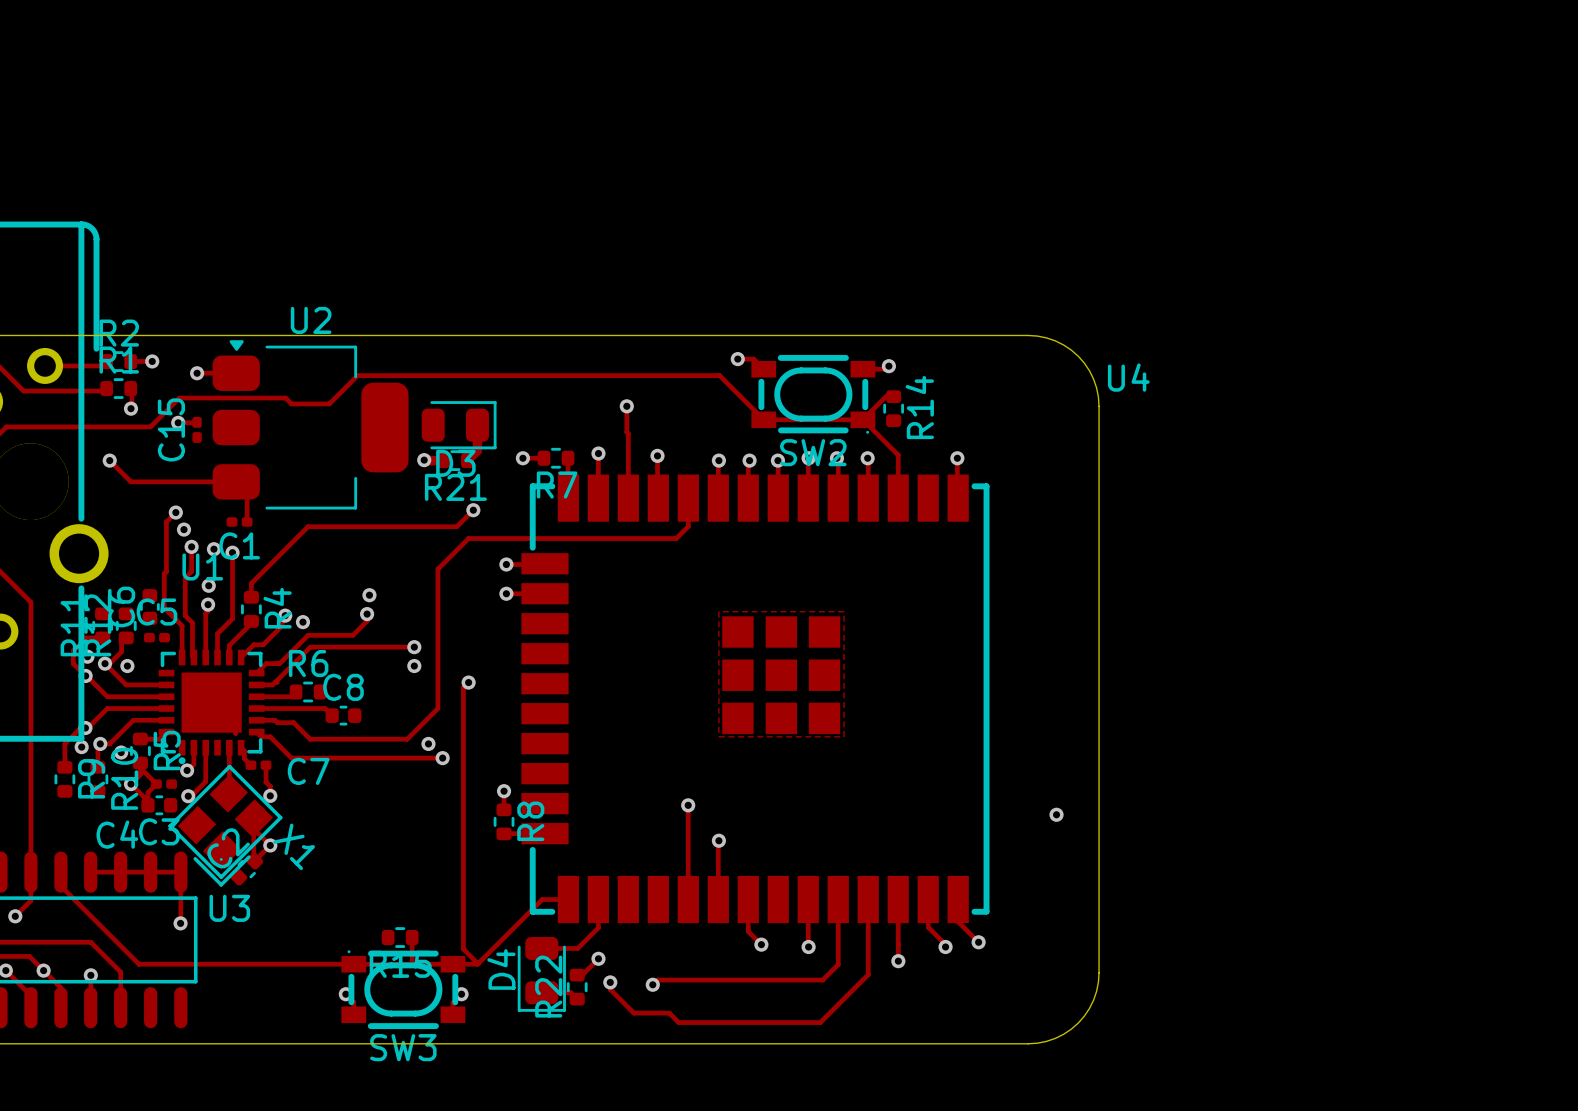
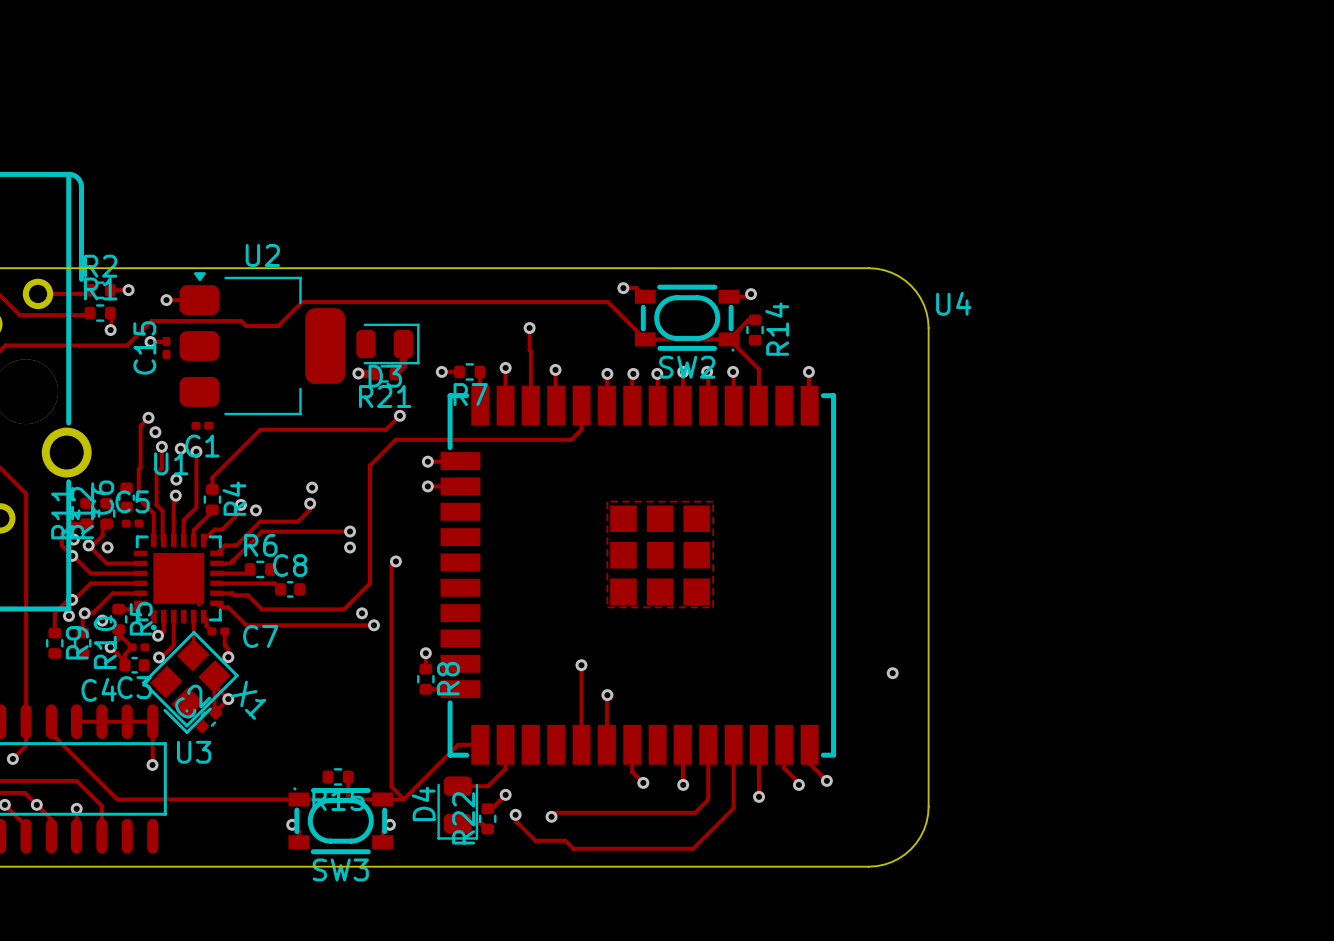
track: (109, 460) (130, 481) (236, 481) (247, 492) (247, 522) -> none
via: (109, 460) -> none

